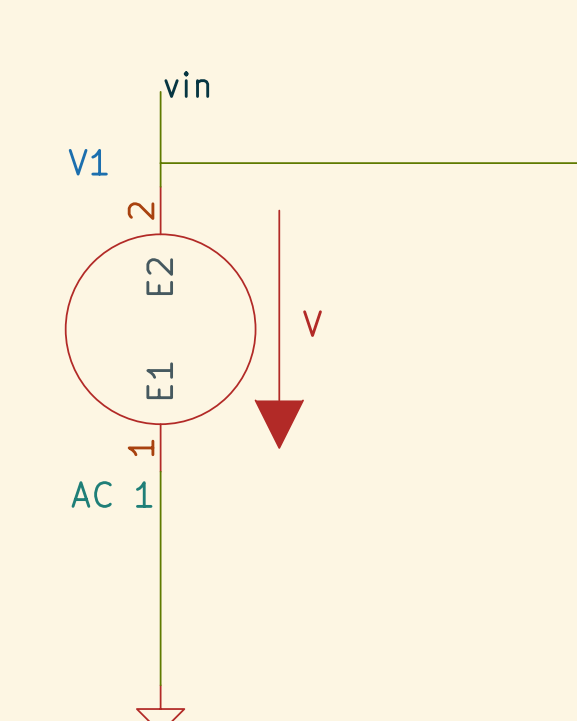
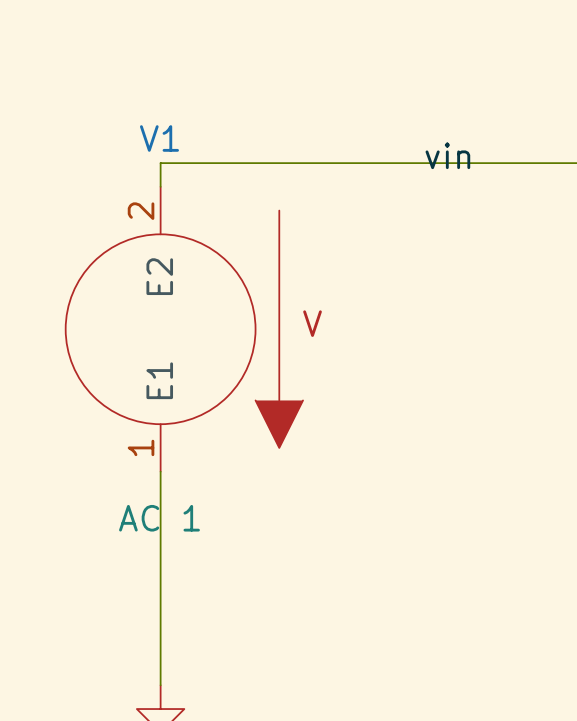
label position: vin (186, 84) -> vin (447, 155)
wire: (160, 91) (160, 163) -> none
V1 name position: V1 (88, 162) -> V1 (159, 138)
V1 value position: AC 1 (112, 494) -> AC 1 (159, 518)

